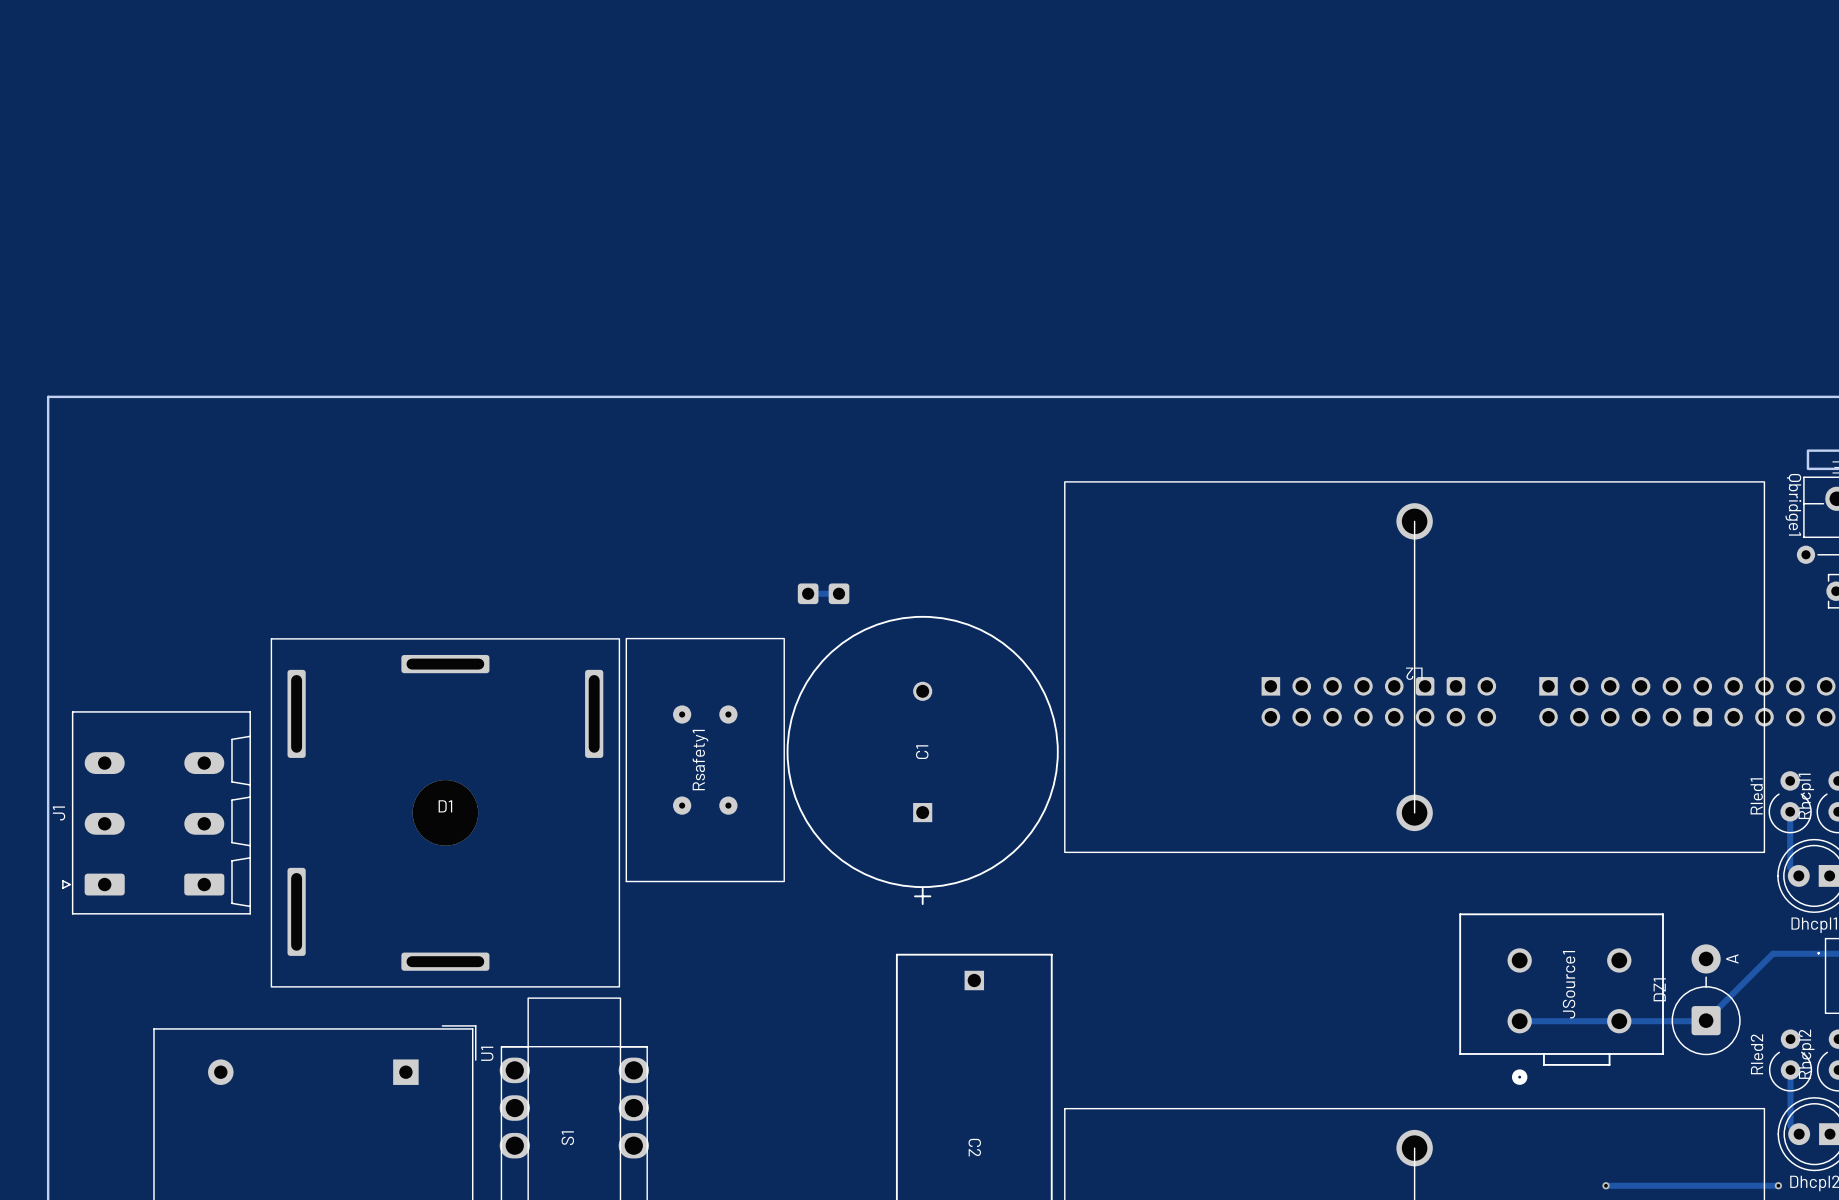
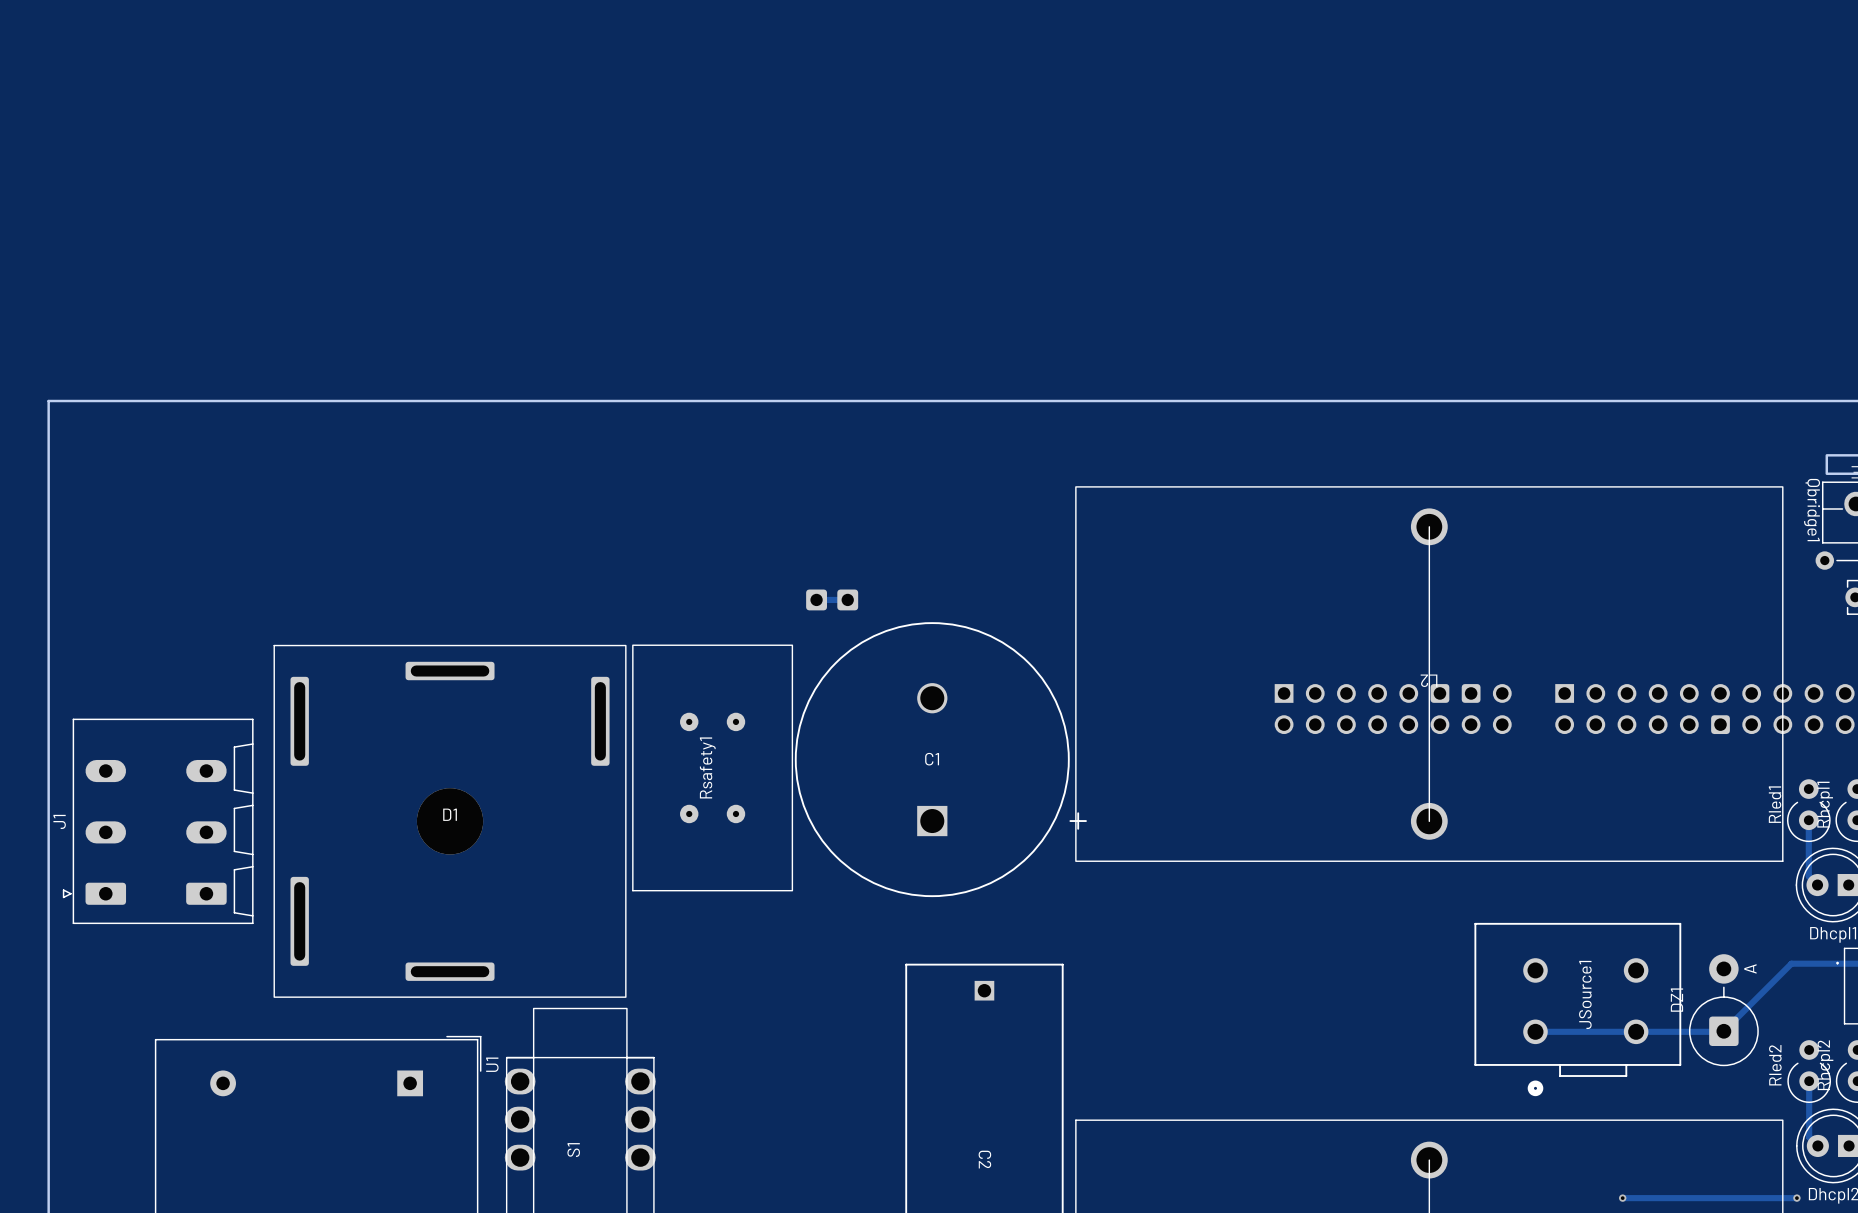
C1 footprint: [786, 615, 1059, 905] -> [794, 622, 1087, 898]

